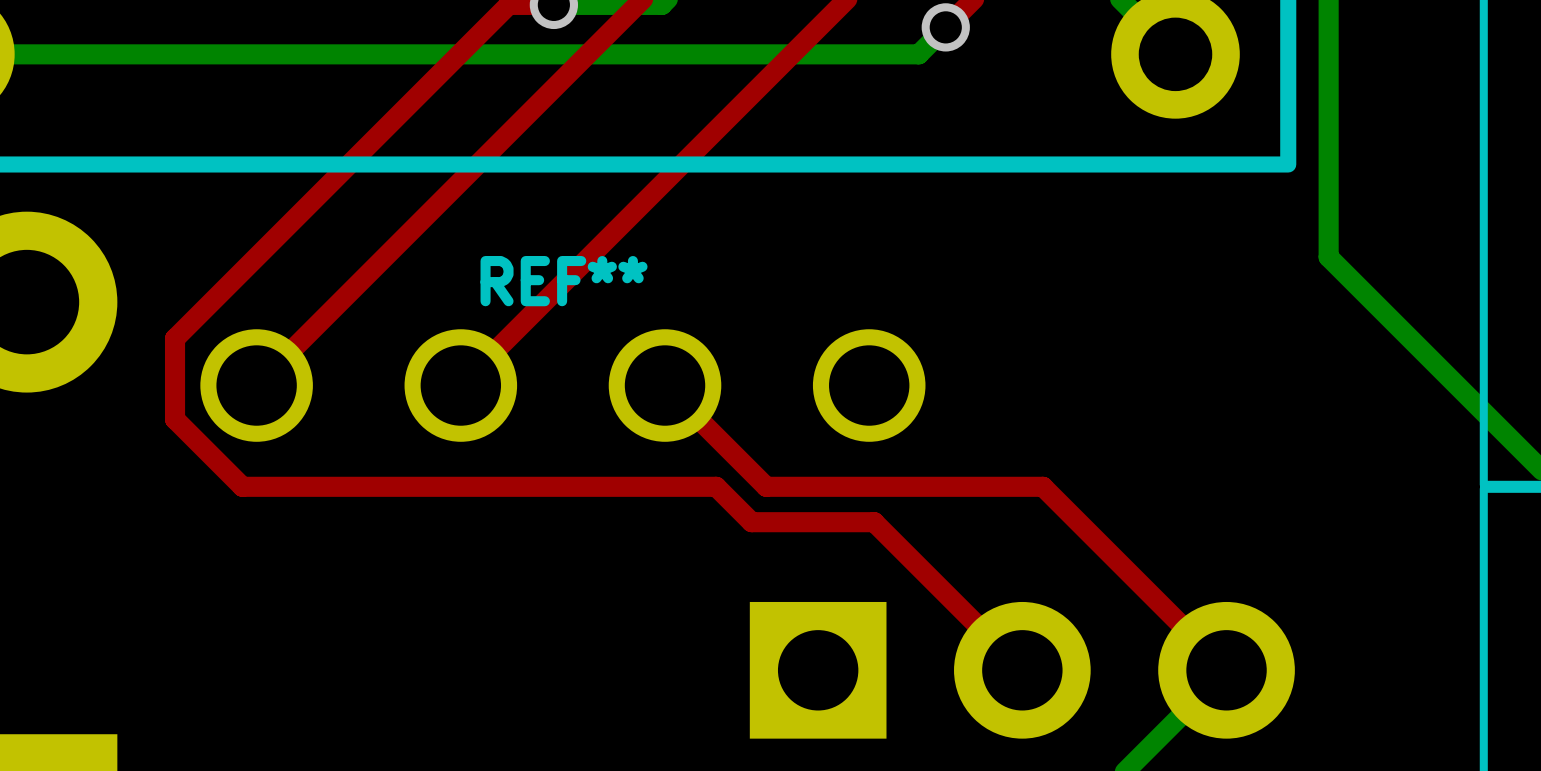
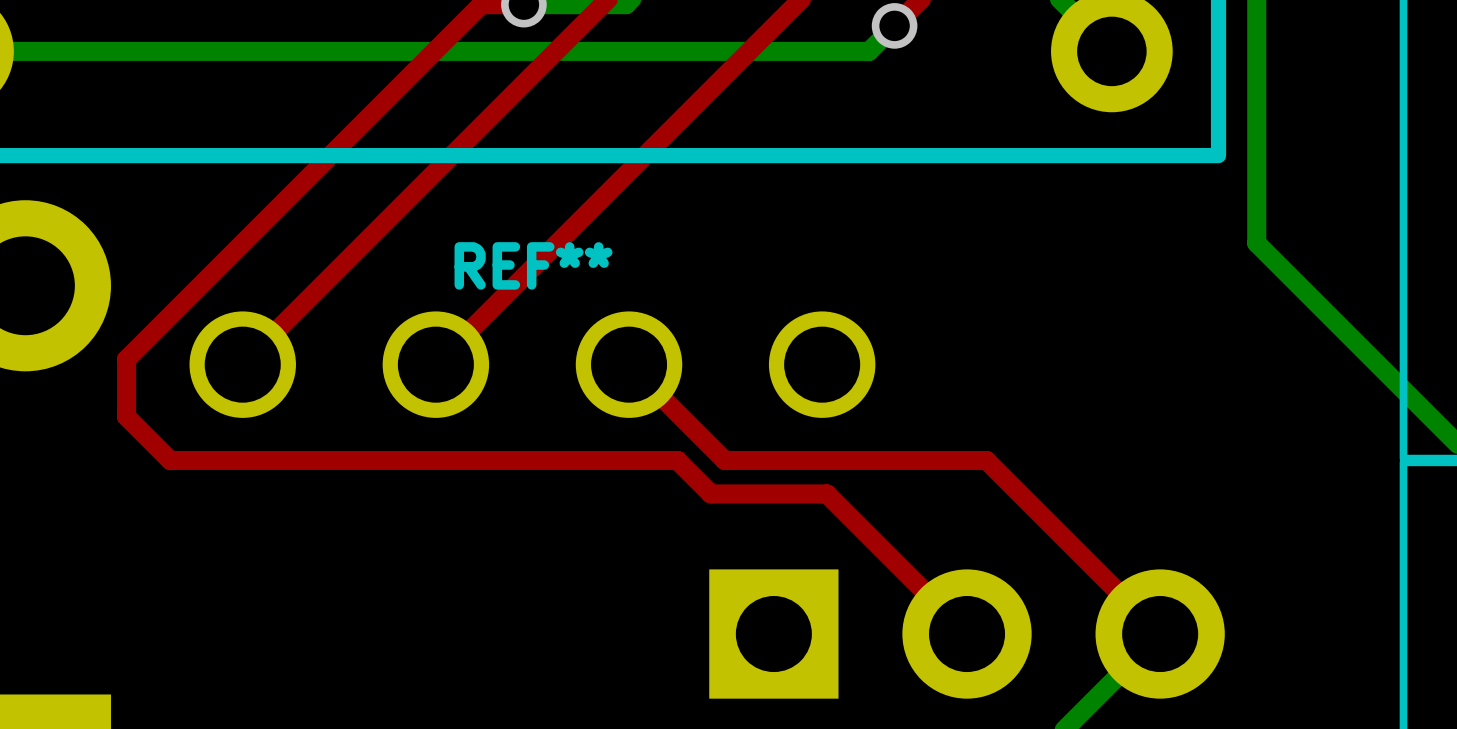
top track: (175, 338) (175, 419) (242, 486) -> (165, 320) (126, 359) (126, 416) (170, 460) (229, 460)

